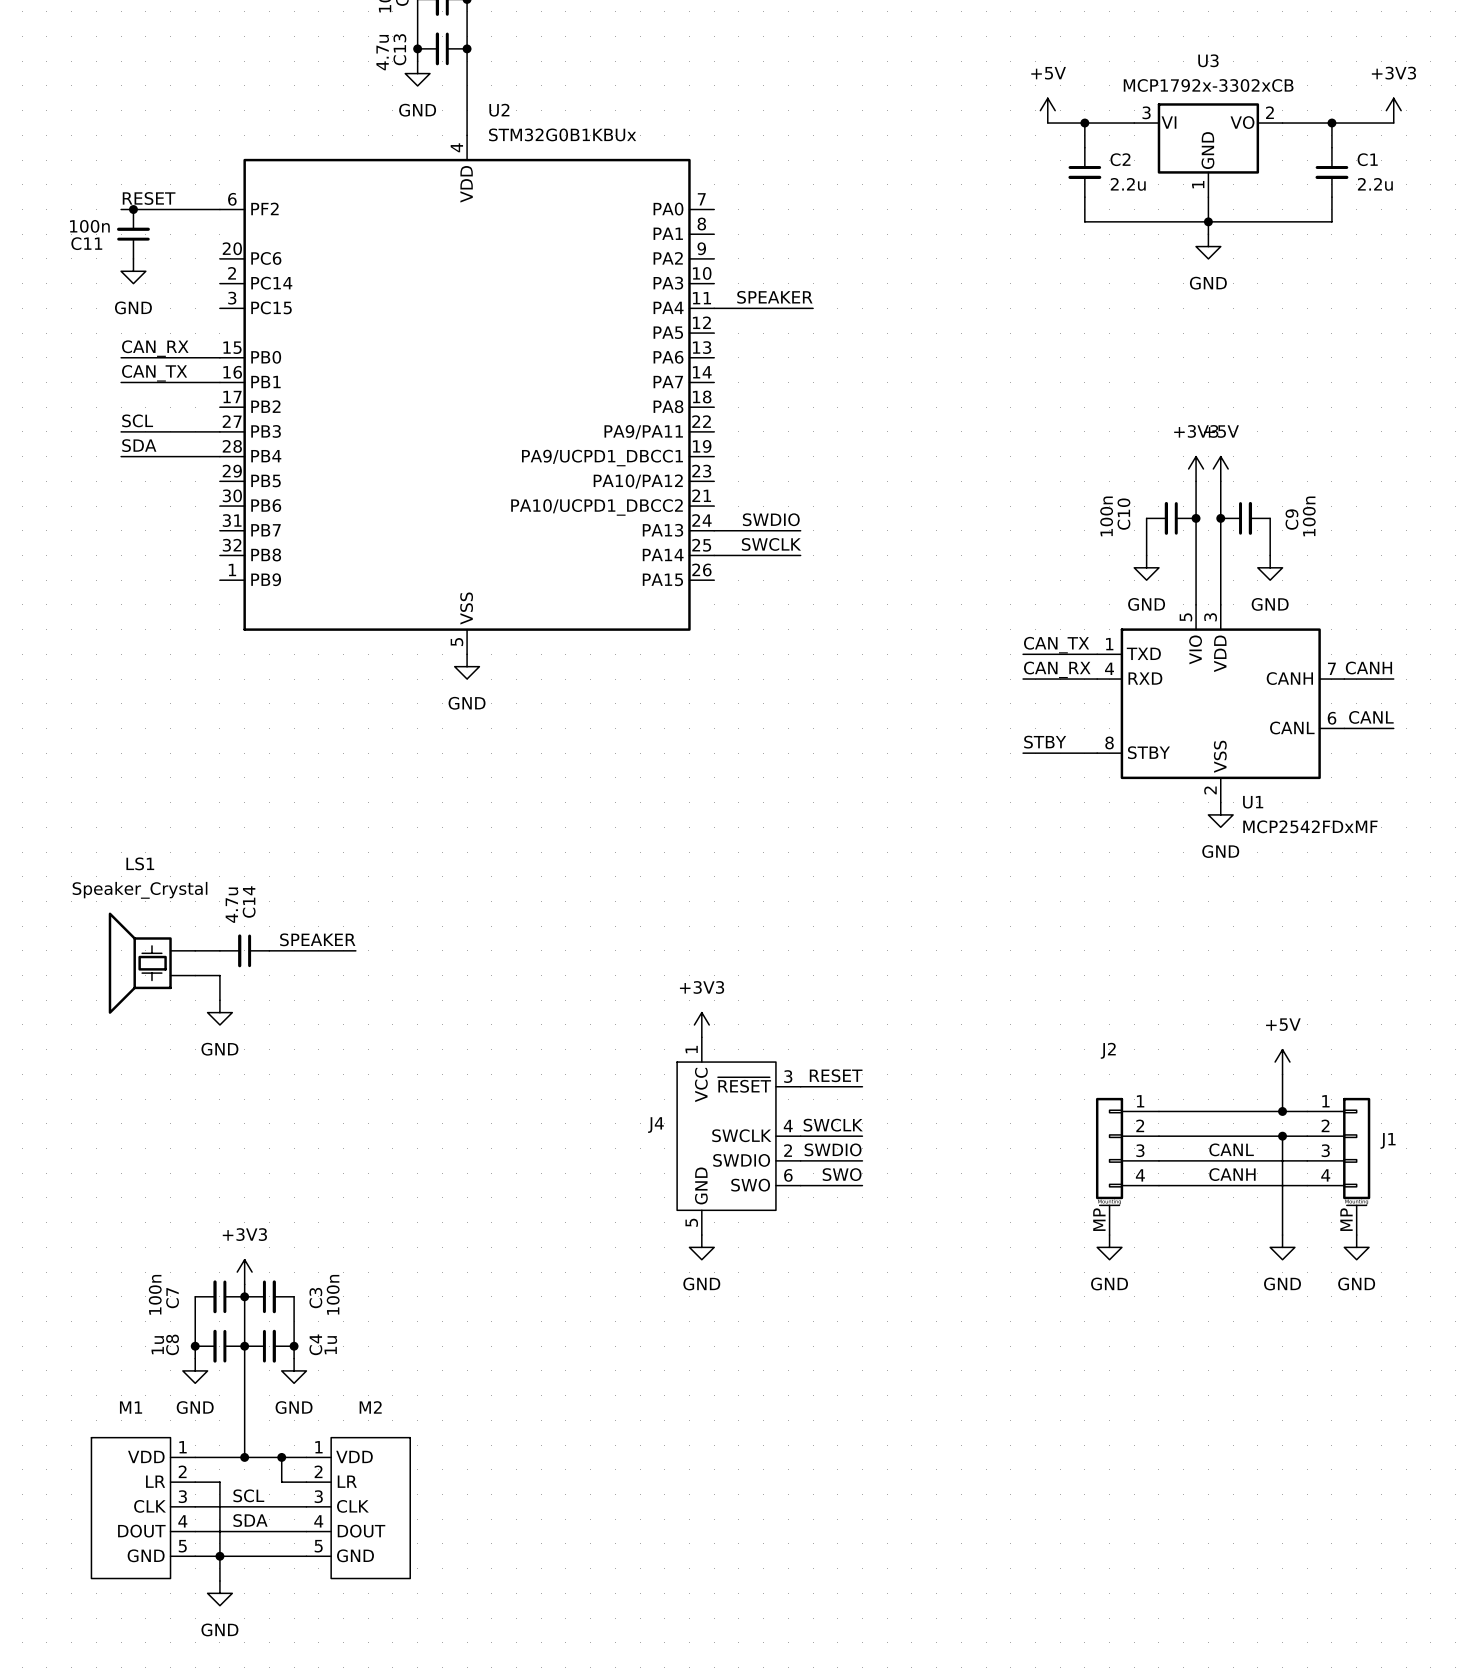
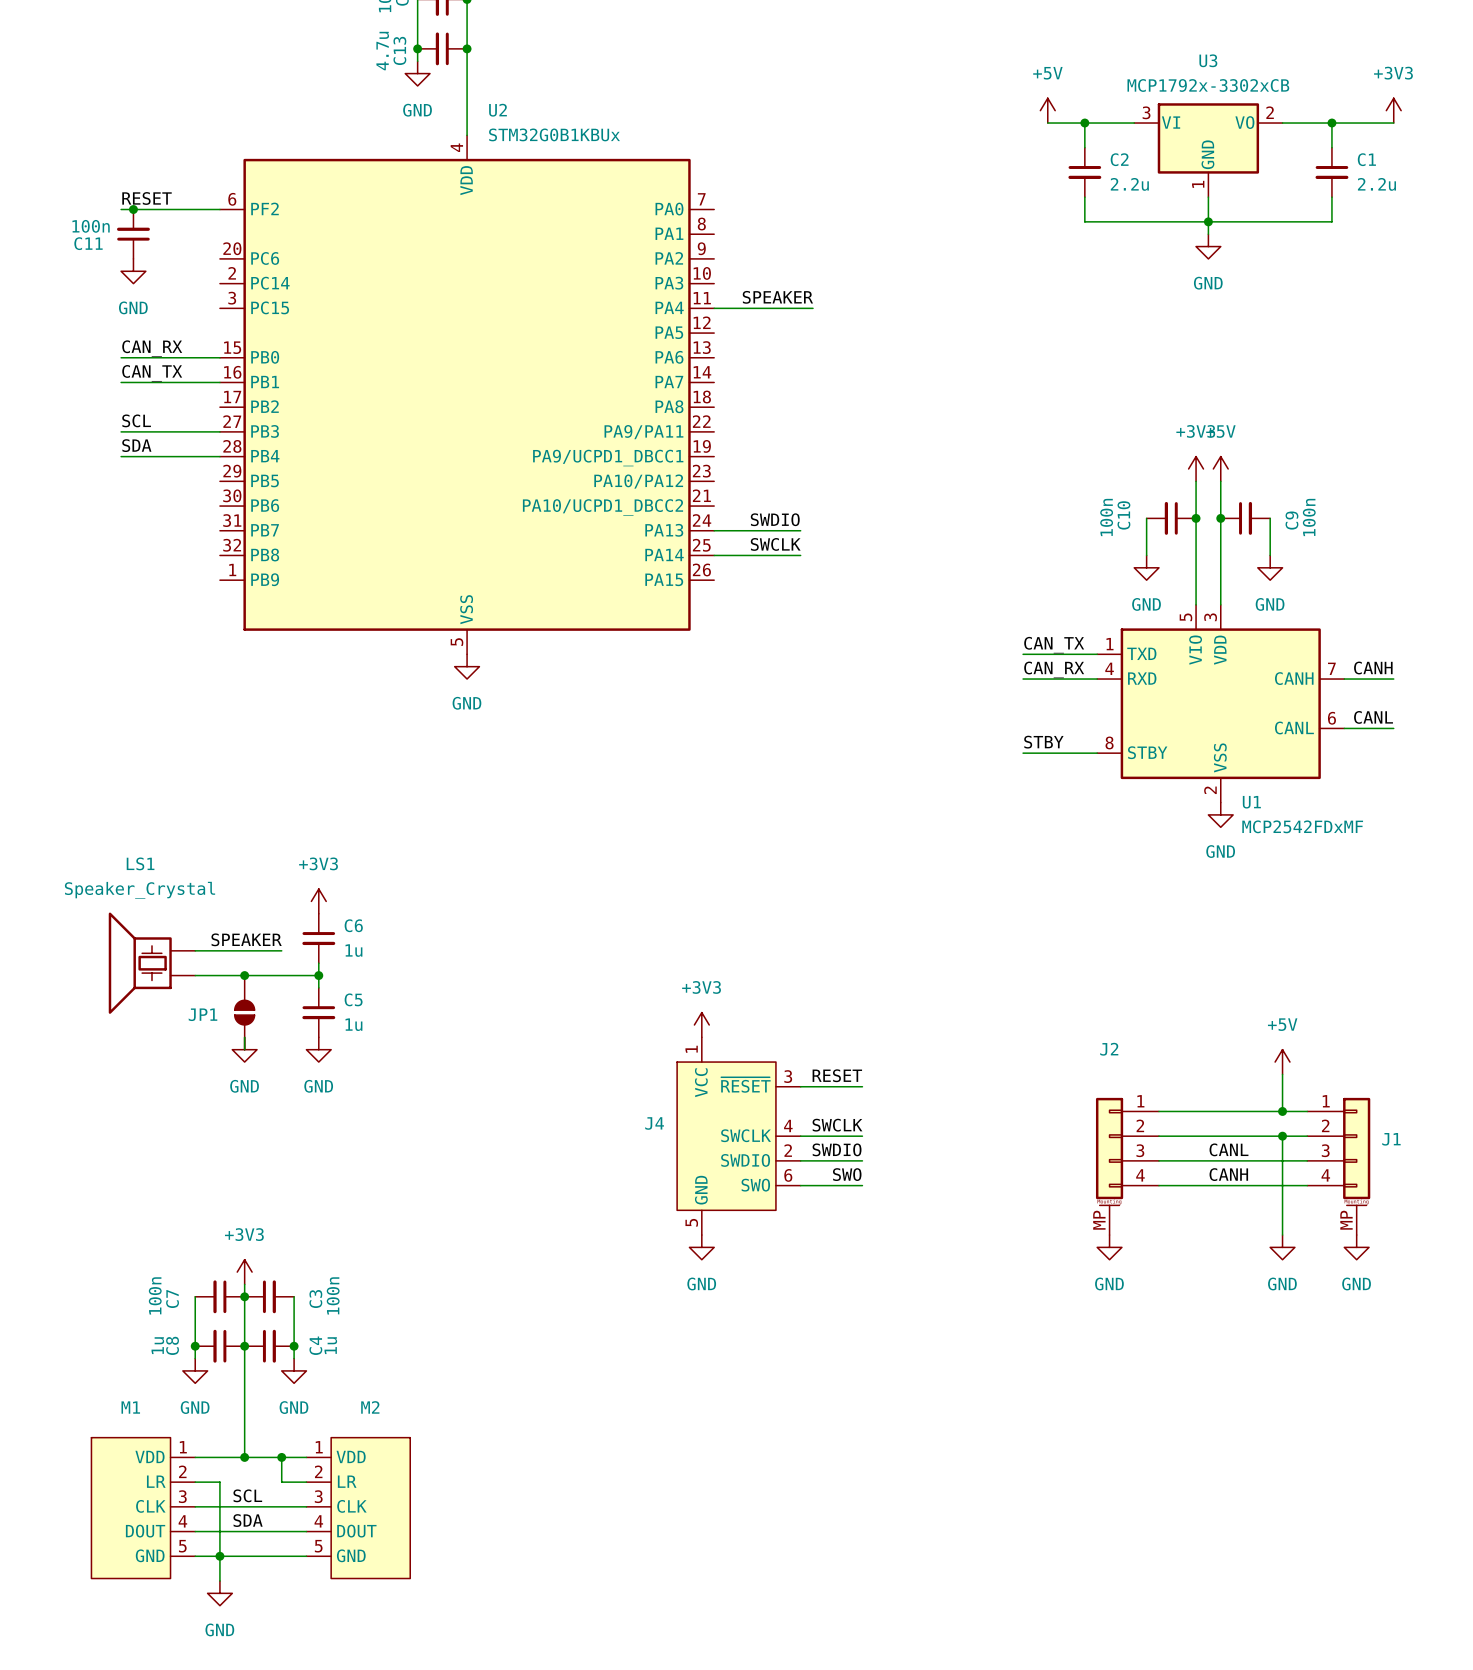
power symbol: none -> +3V3 (318, 901)
C6: none -> 1u (318, 938)
label position: SPEAKER (317, 939) -> SPEAKER (246, 939)
C14: 4.7u (244, 950) -> none
wire: (281, 950) (355, 950) -> none
wire: none -> (318, 963) (318, 987)
wire: (219, 975) (219, 1000) -> (219, 975) (318, 975)
junction: none -> (244, 975)
junction: none -> (318, 975)
power symbol position: GND (219, 1012) -> GND (244, 1049)
JP1: none -> (244, 1012)
C5: none -> 1u (318, 1012)
wire: none -> (244, 1037) (244, 1049)
power symbol: none -> GND (318, 1049)

